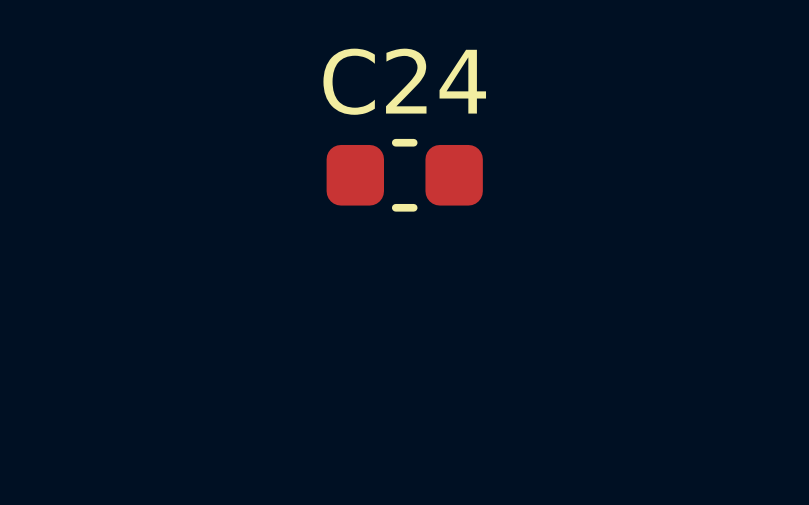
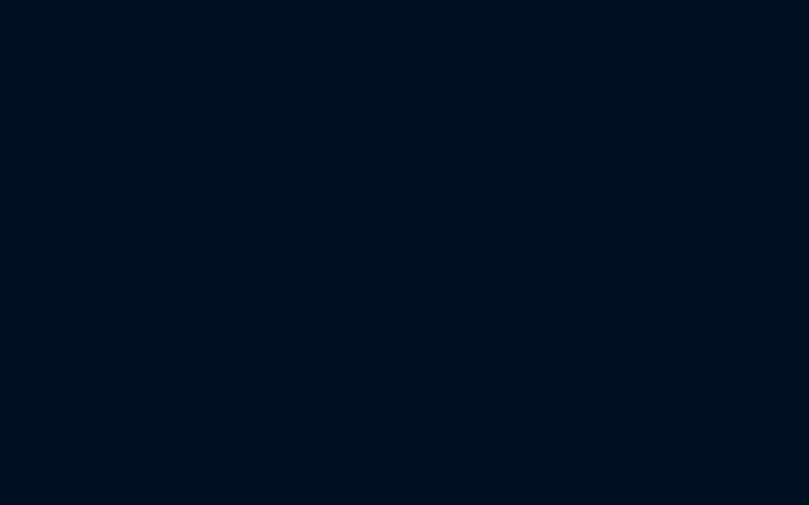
C24: (404, 175) -> none

